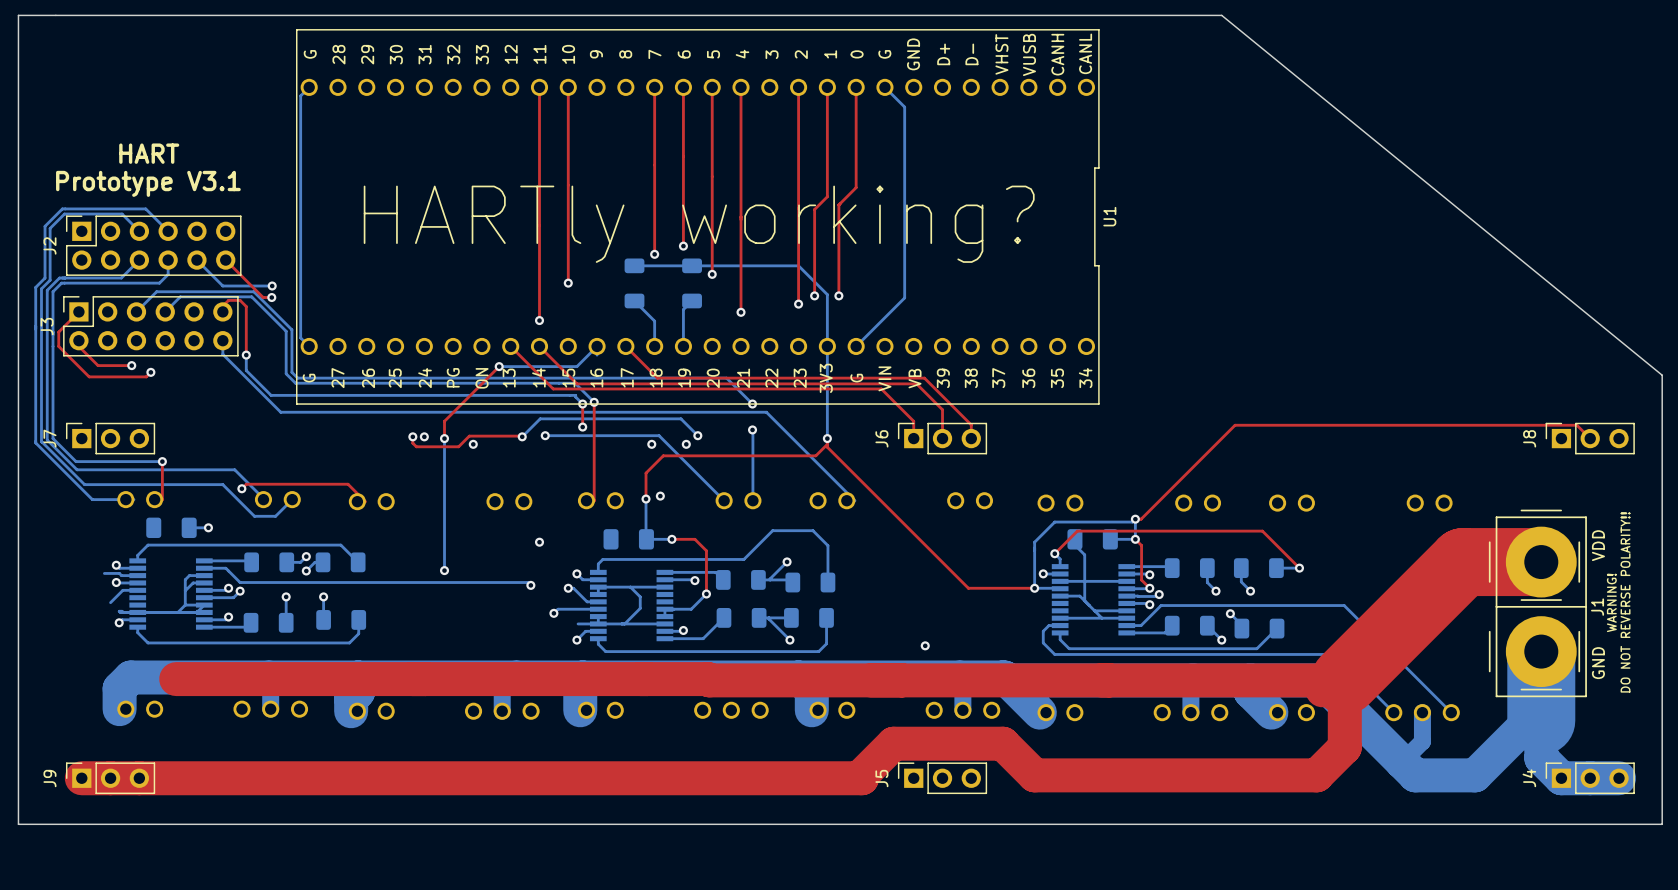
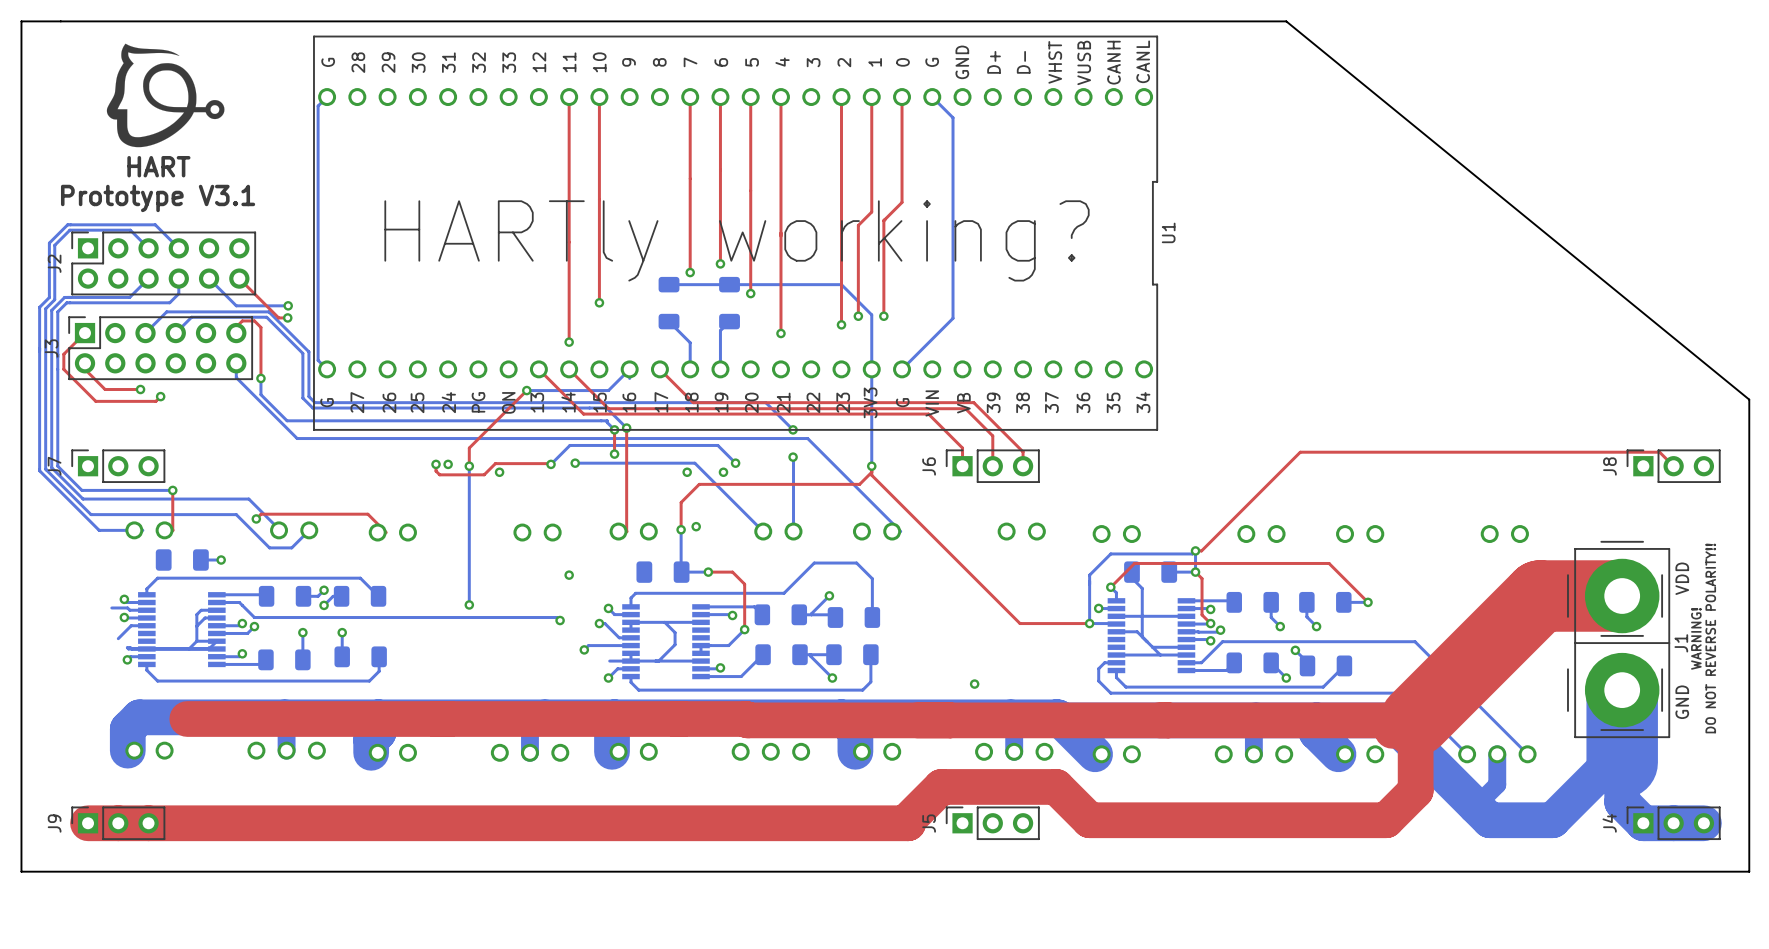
drawing: none -> [106, 43, 225, 148]

